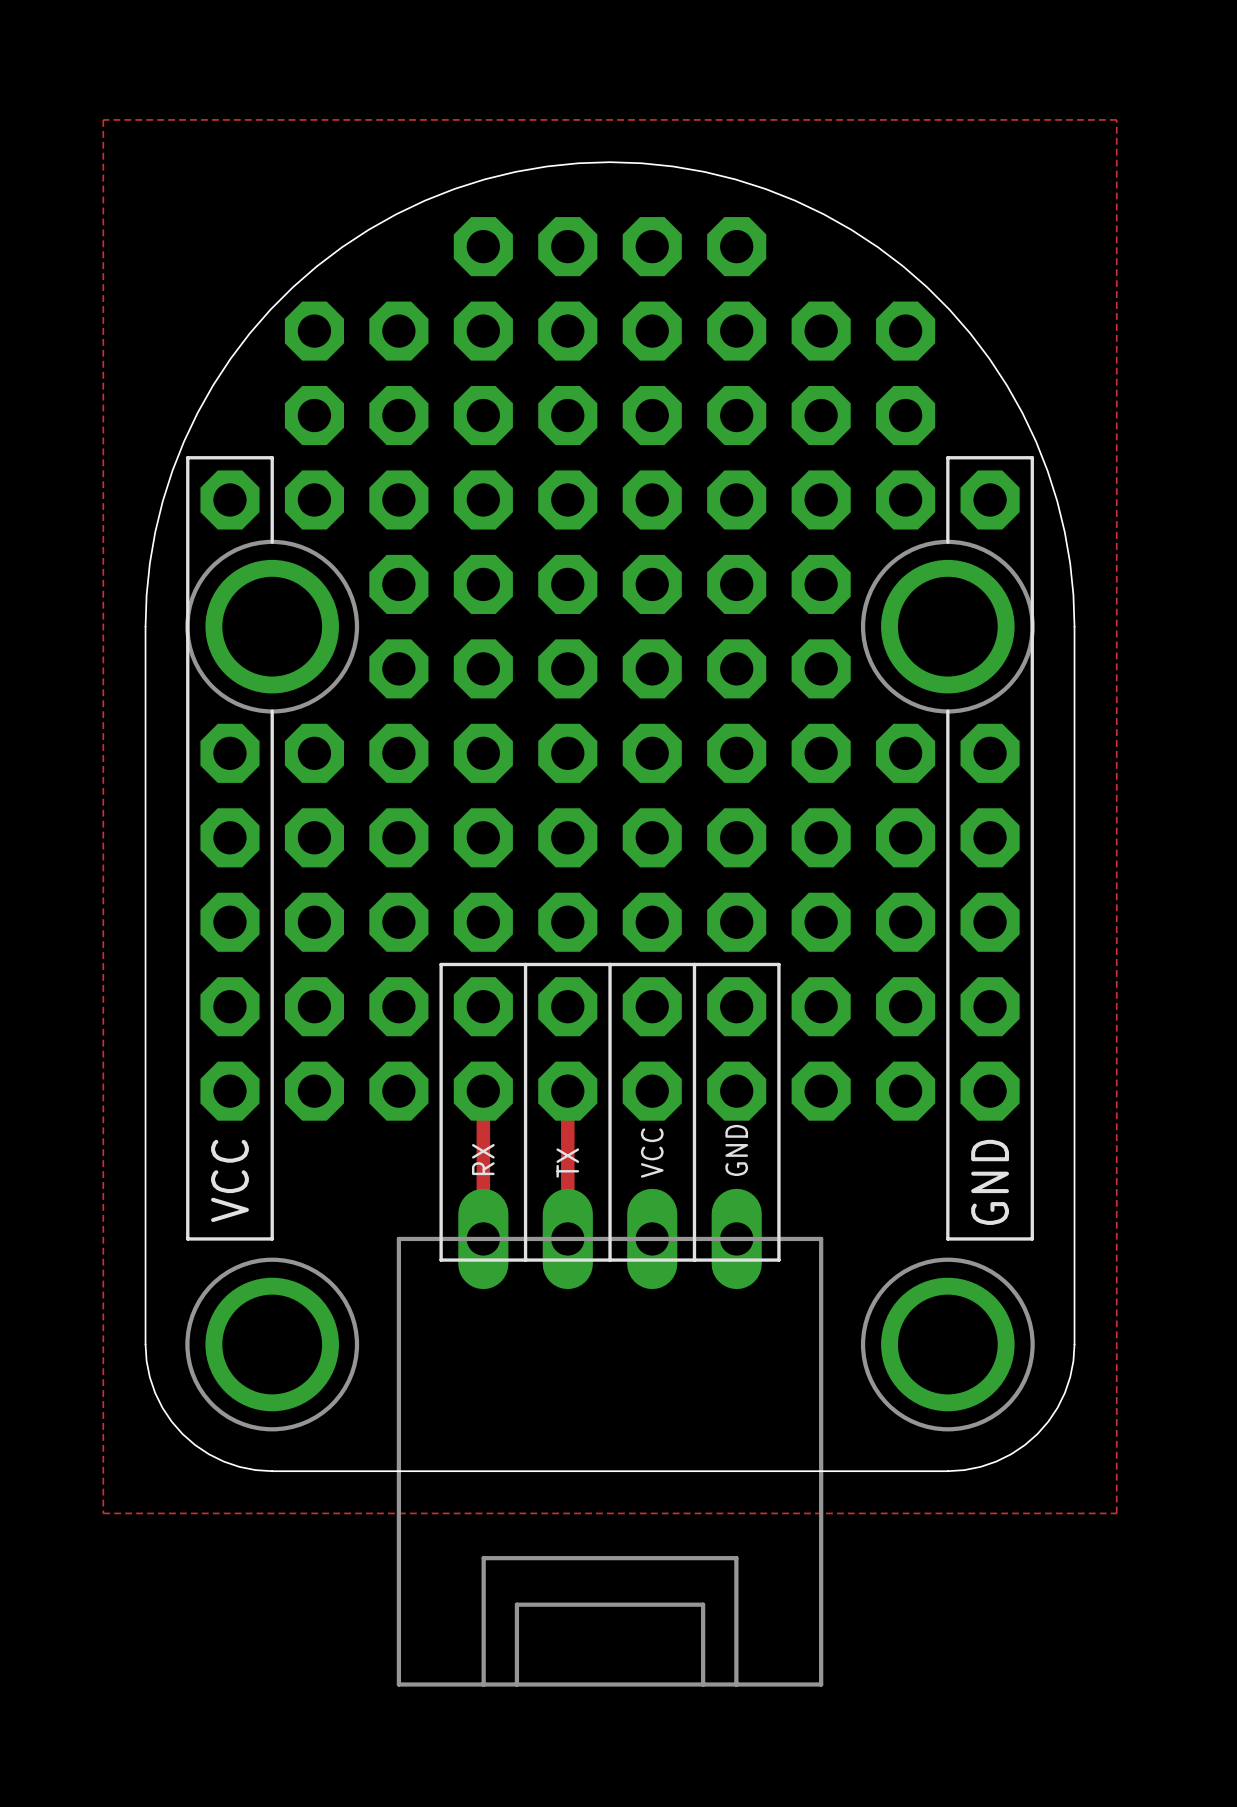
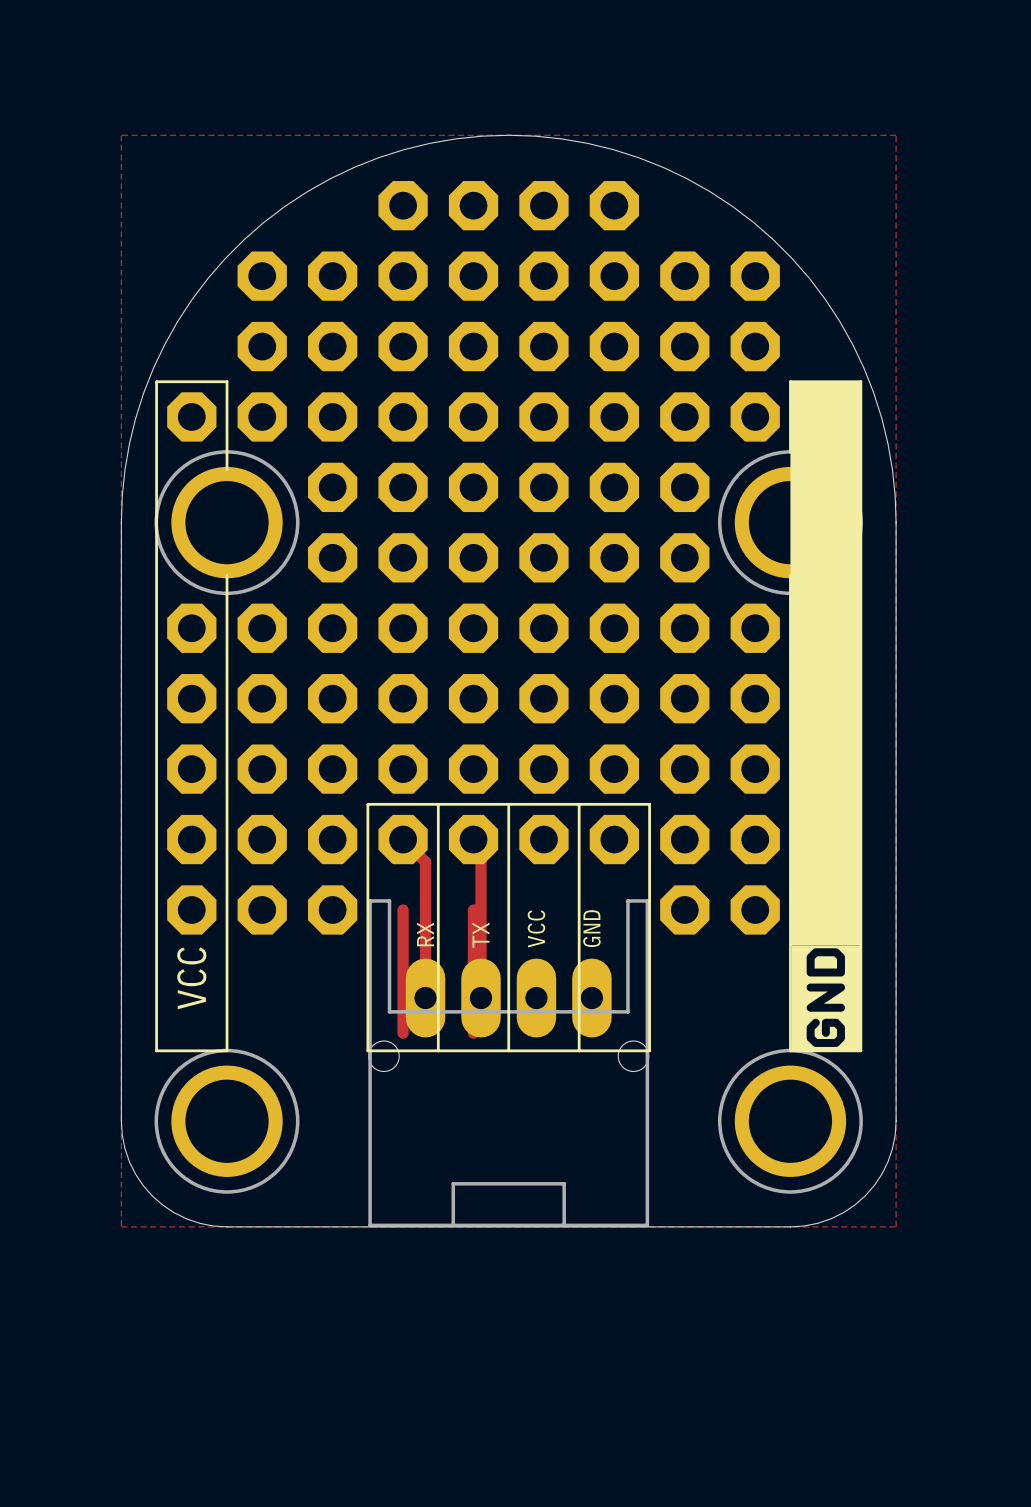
zone outline: (103, 119) (1116, 119) (1116, 1513) (103, 1513) (103, 119) -> (121, 135) (121, 1226) (896, 1226) (896, 135) (121, 135)
drawing: none -> [790, 381, 861, 1051]
line: none -> (227, 452) (227, 469)
line: none -> (227, 575) (227, 593)
line: none -> (790, 575) (790, 593)
part: none -> (508, 681)
part: (610, 924) -> none
track: none -> (403, 839) (425, 862) (425, 998)
part: none -> (403, 839)
track: none -> (473, 839) (481, 847) (481, 998)
part: none -> (473, 839)
part: (483, 1091) -> none
part: (567, 1091) -> none
part: (652, 1091) -> none
part: (736, 1091) -> none
text: GND (990, 1182) -> none
line: (187, 1238) (272, 1238) -> (156, 1033) (156, 1050) (227, 1050) (227, 1033)
line: (947, 1238) (1032, 1238) -> (790, 1033) (790, 1050) (860, 1050) (860, 1033)

